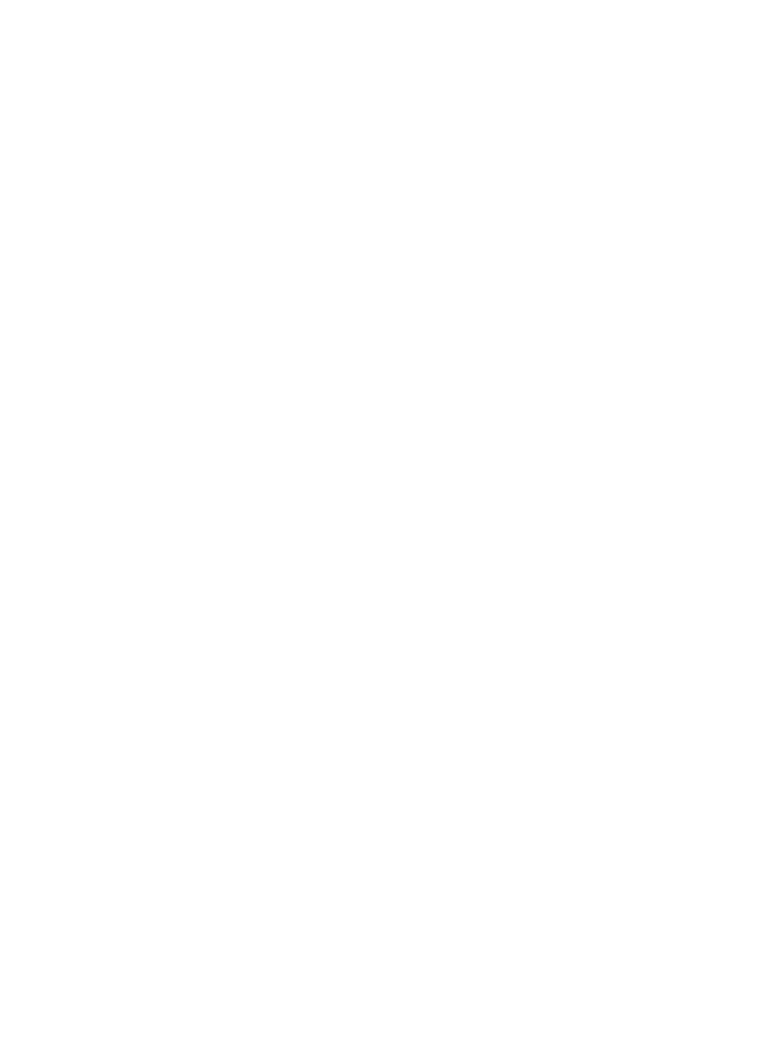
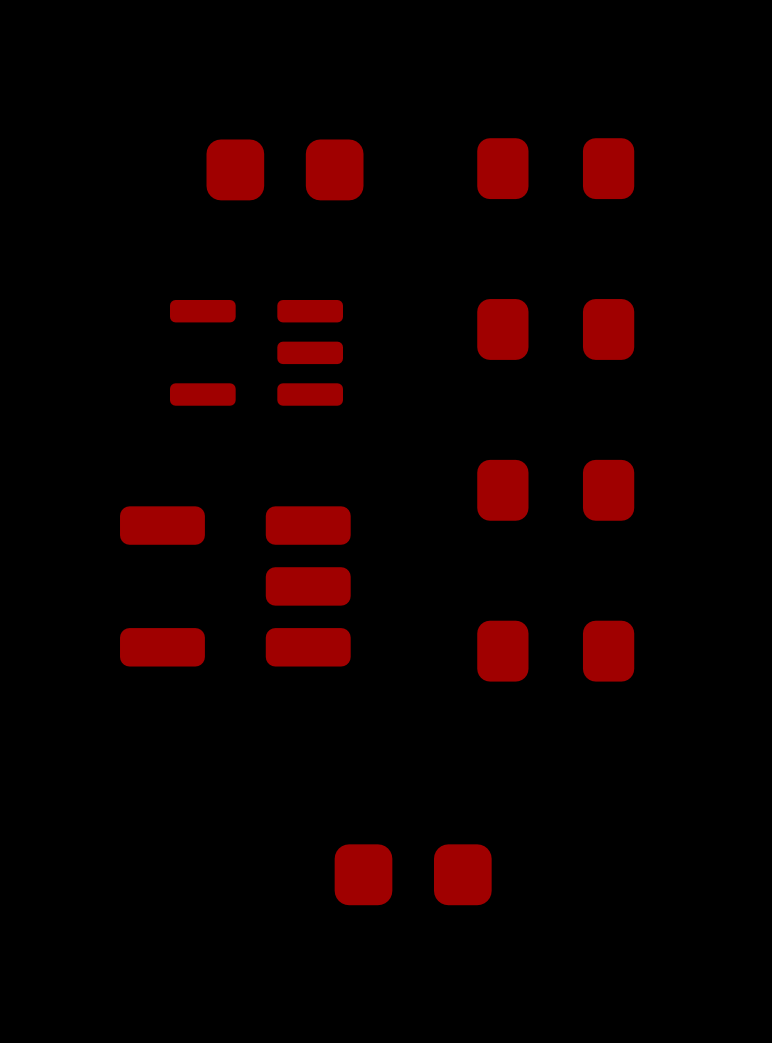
part: none -> (555, 168)
part: none -> (285, 169)
part: none -> (555, 329)
part: none -> (256, 352)
part: none -> (555, 490)
part: none -> (235, 586)
part: none -> (555, 651)
part: none -> (413, 874)

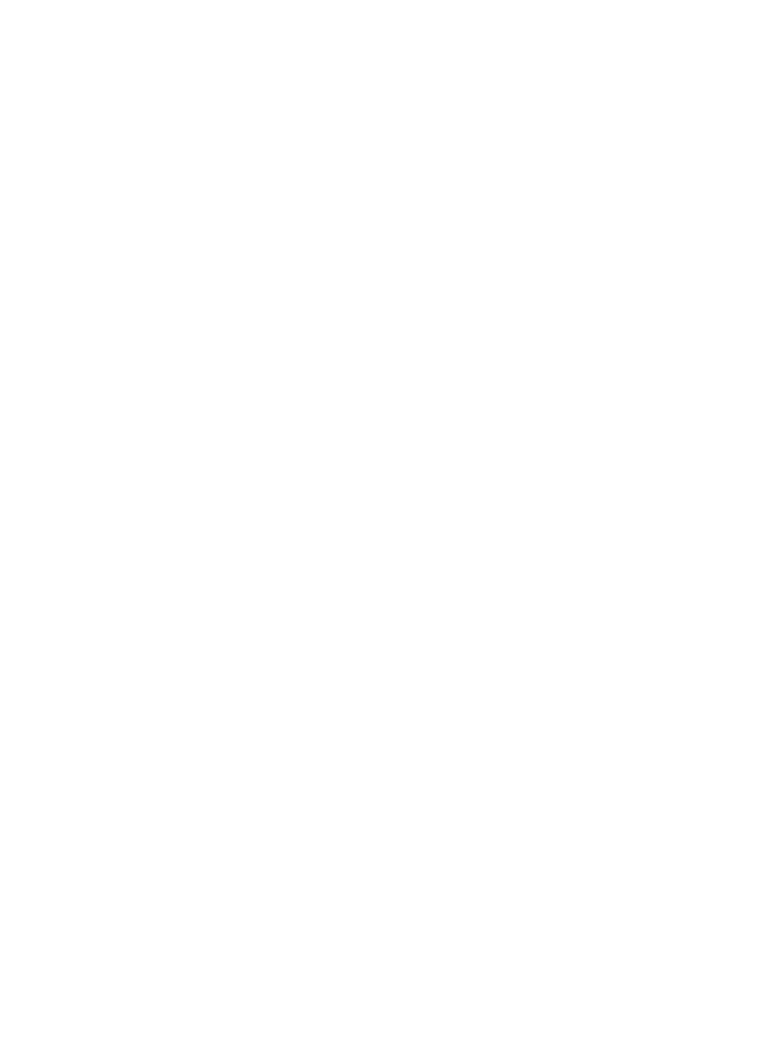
part: (555, 168) -> none
part: (285, 169) -> none
part: (555, 329) -> none
part: (256, 352) -> none
part: (555, 490) -> none
part: (235, 586) -> none
part: (555, 651) -> none
part: (413, 874) -> none

